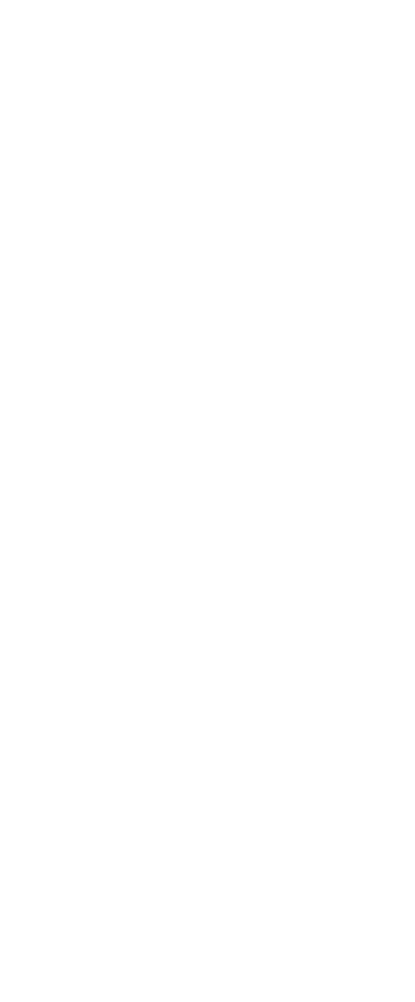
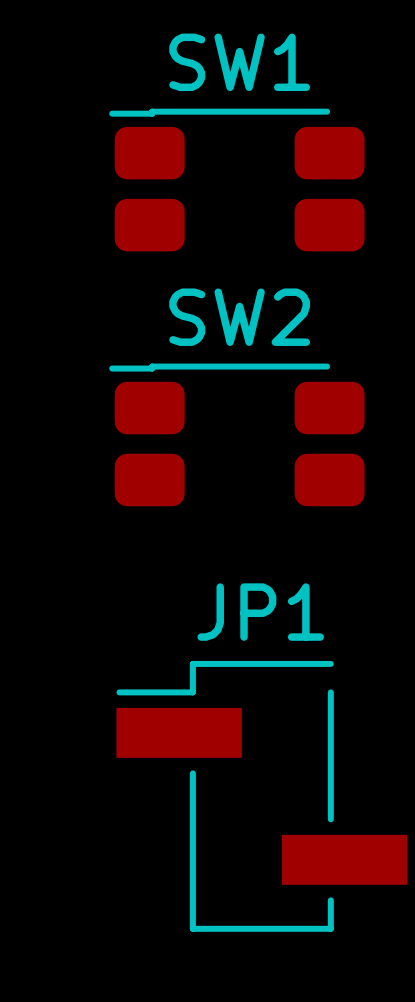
SW1: none -> (236, 180)
SW2: none -> (236, 434)
JP1: none -> (261, 796)

